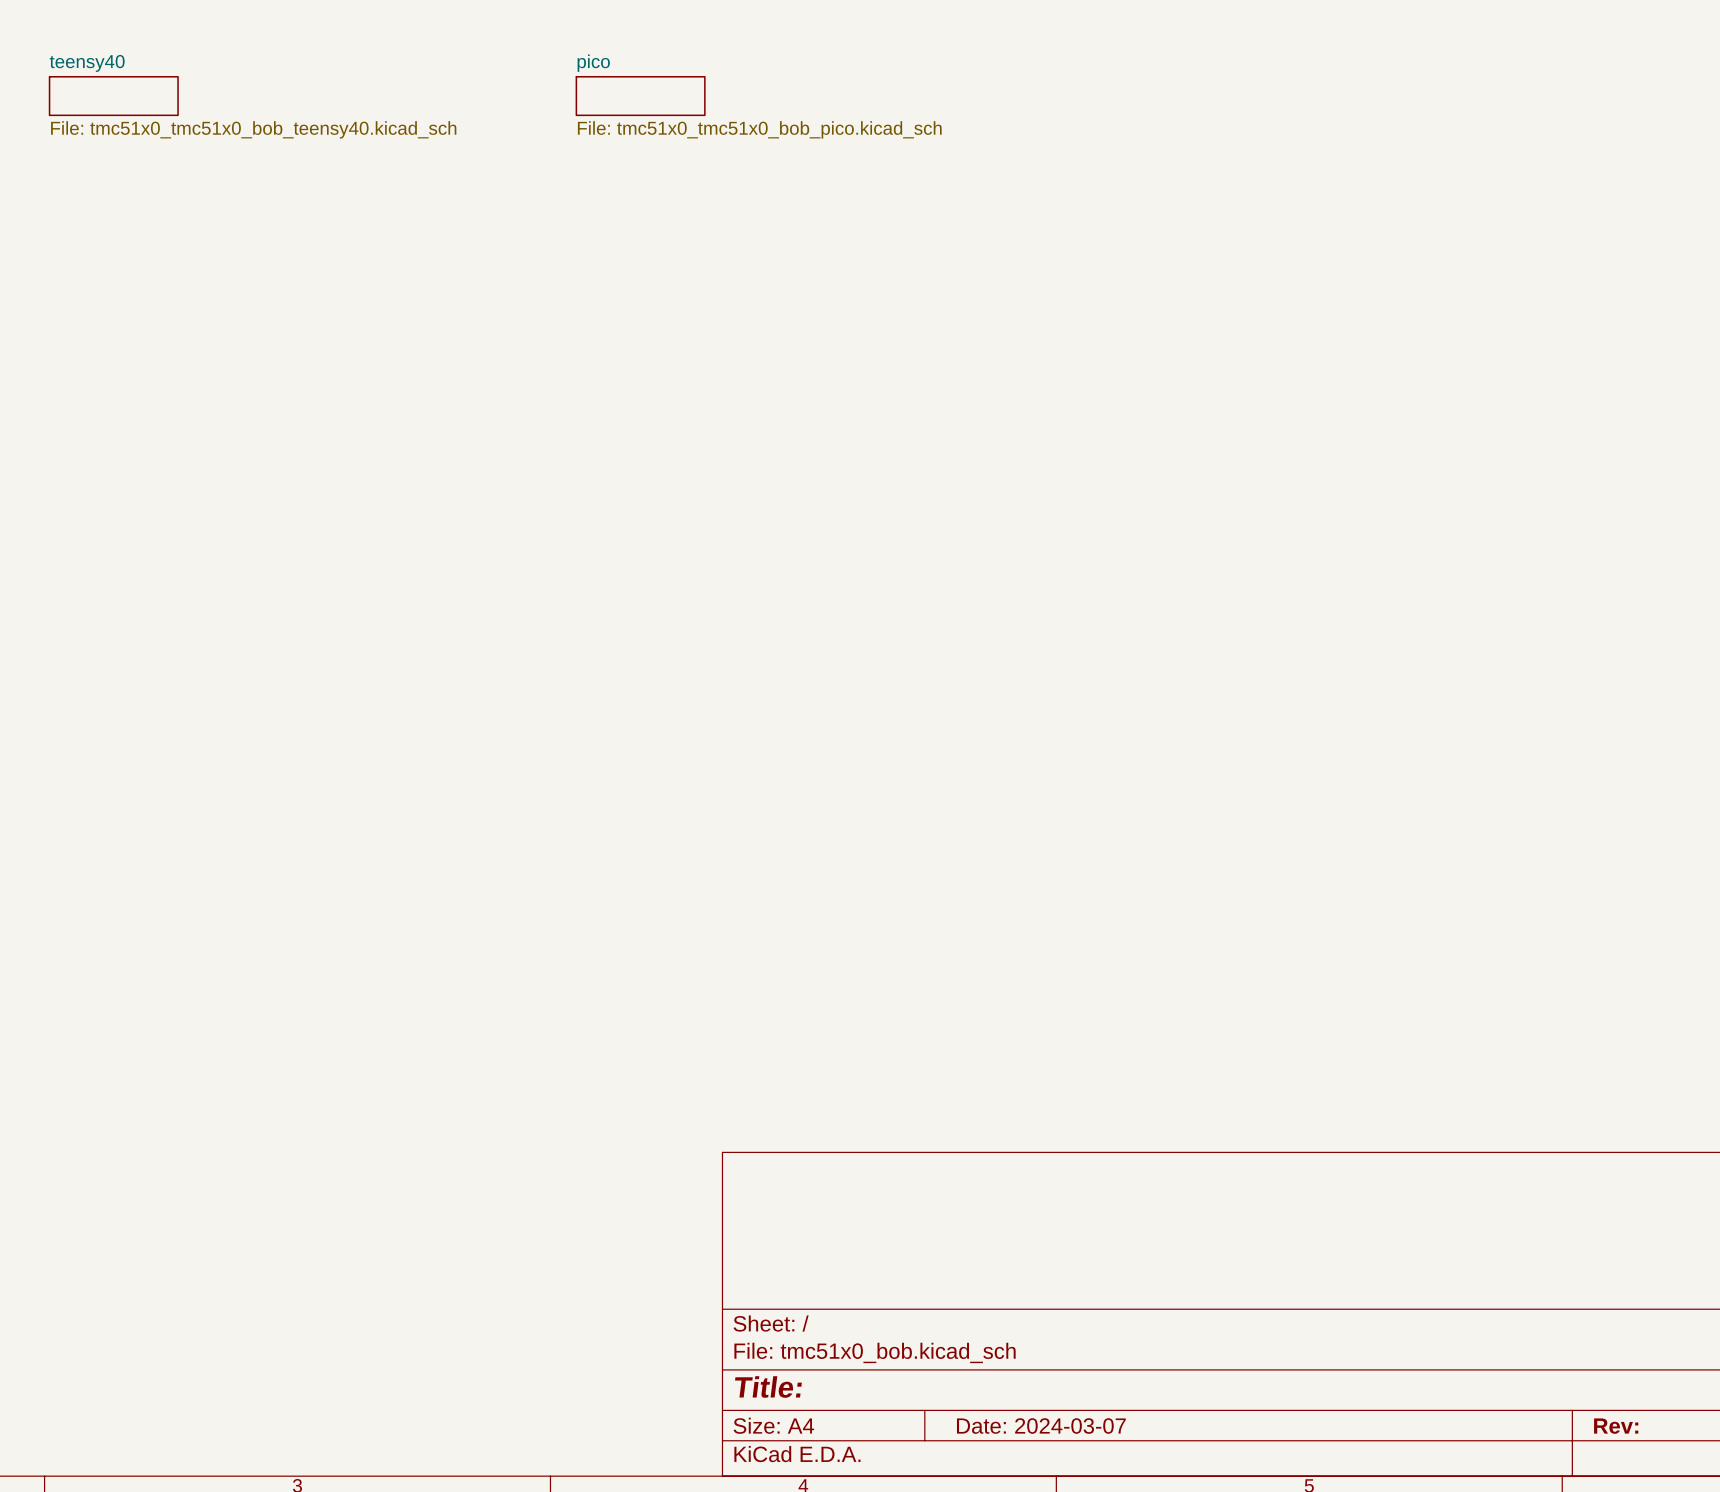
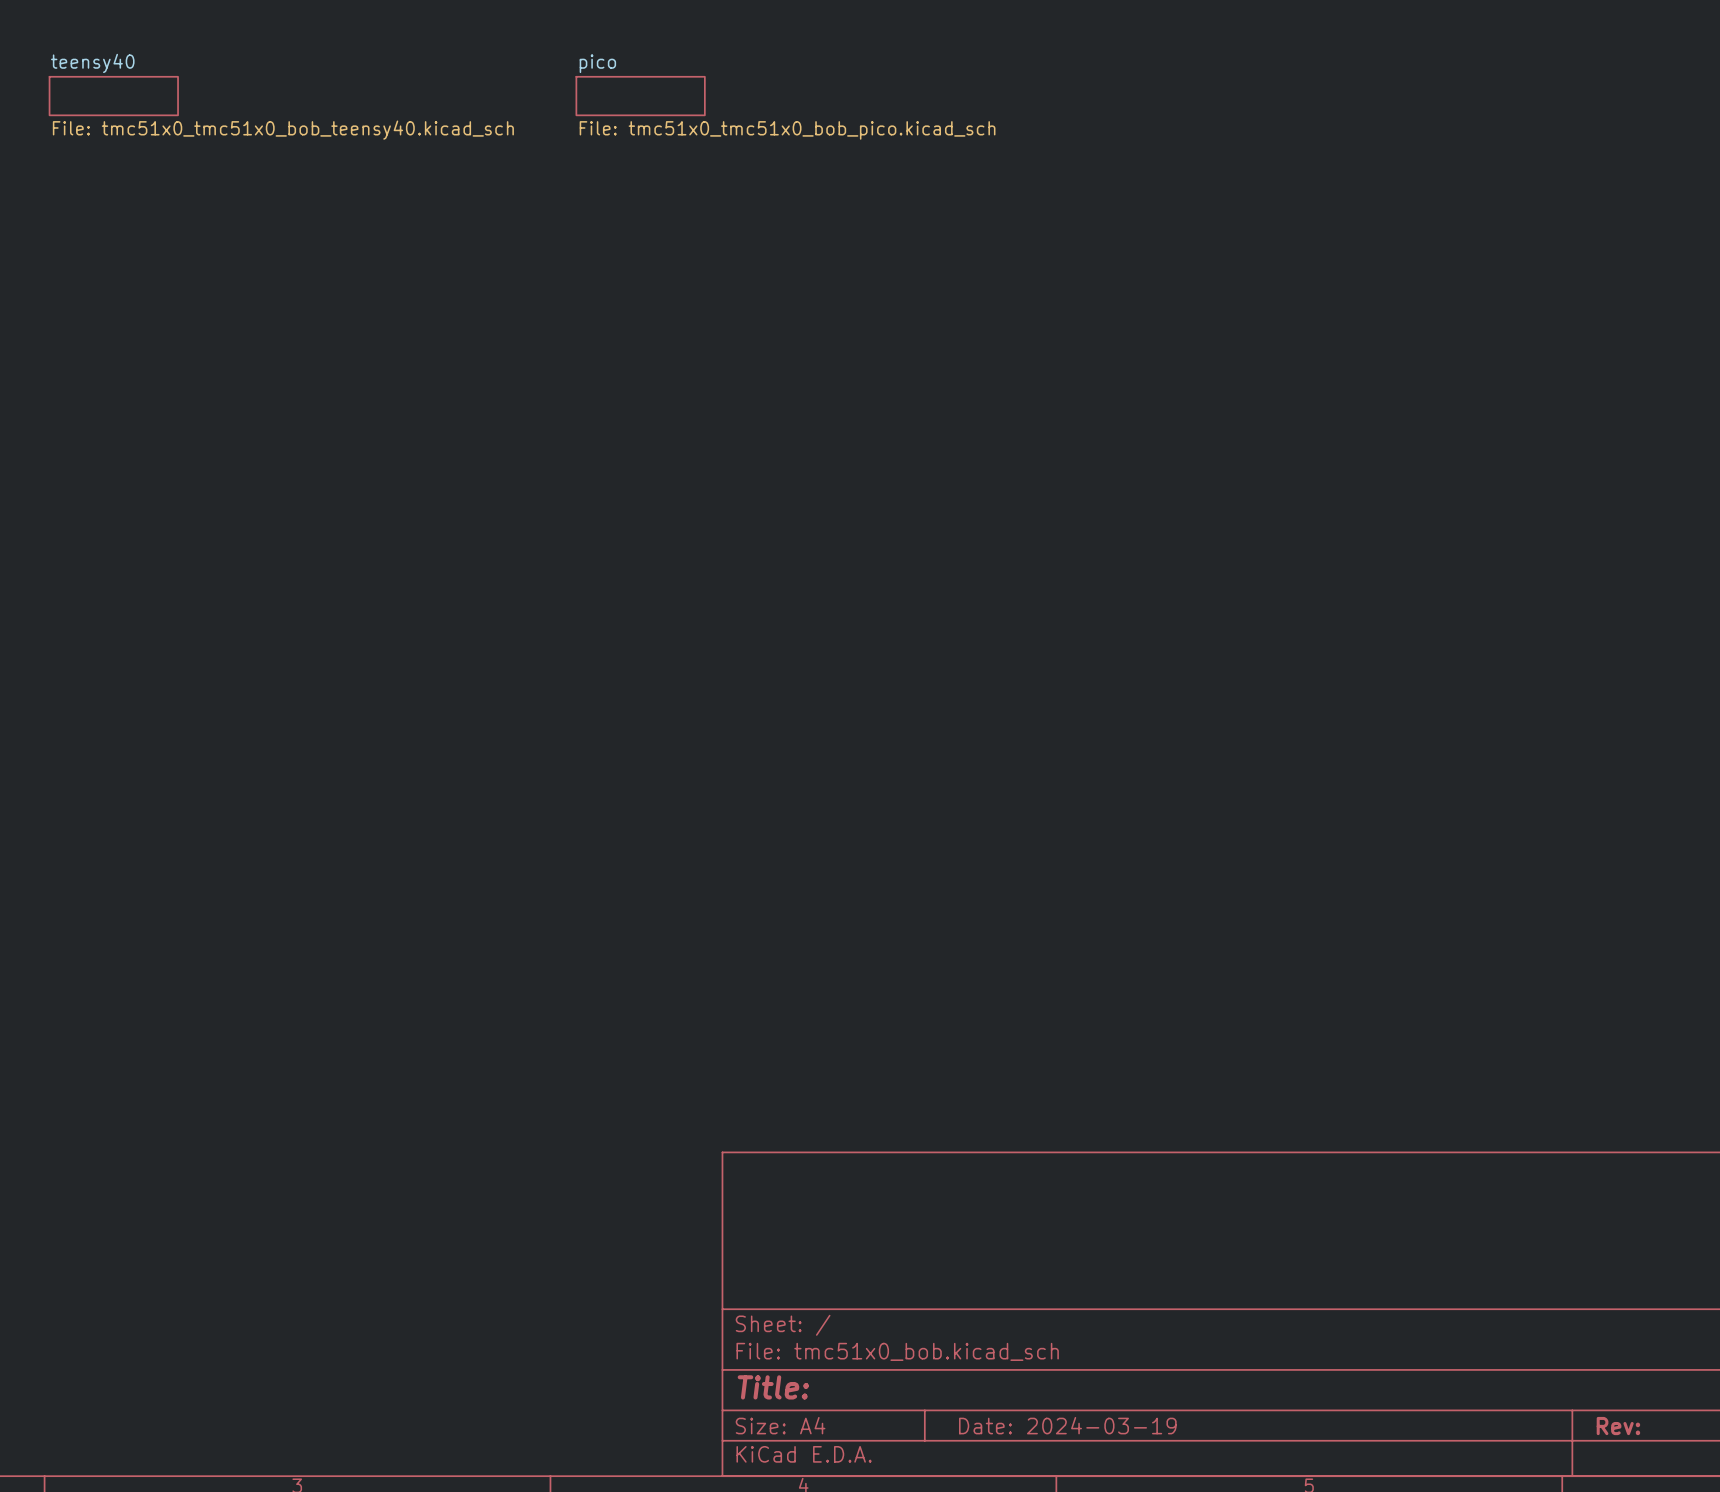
title block: Date: 2024-03-07 (1041, 1426) -> Date: 2024-03-19 (1067, 1425)

